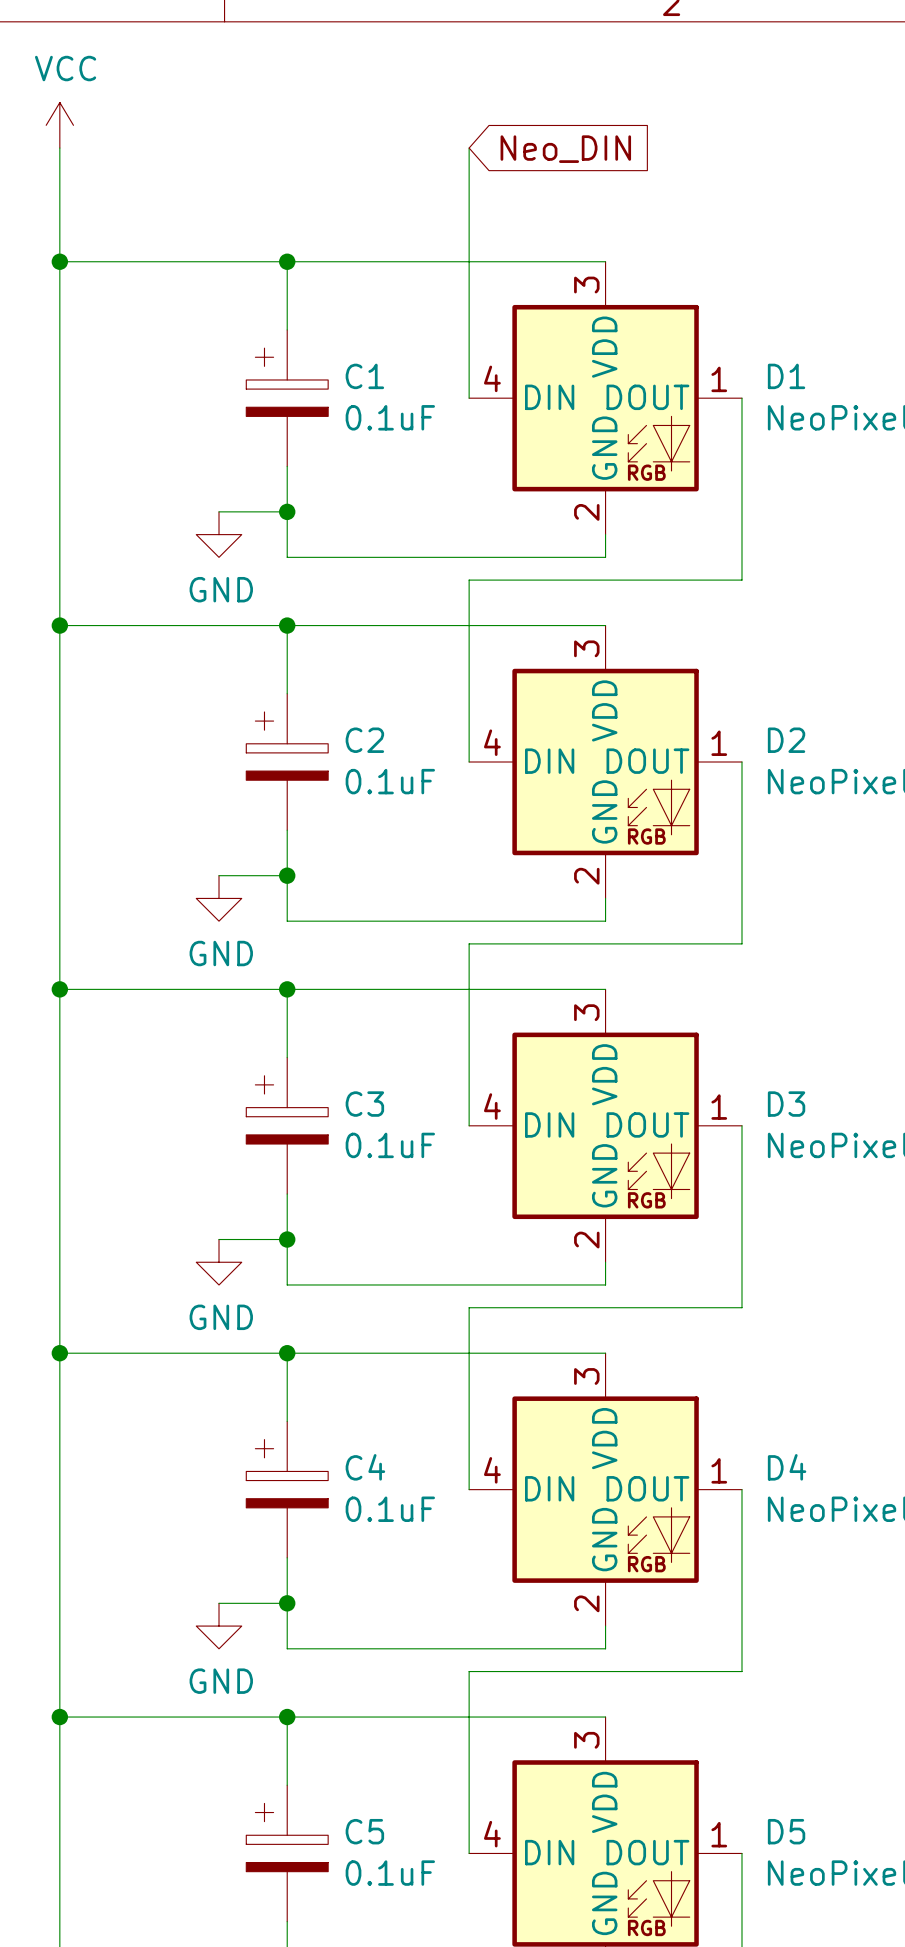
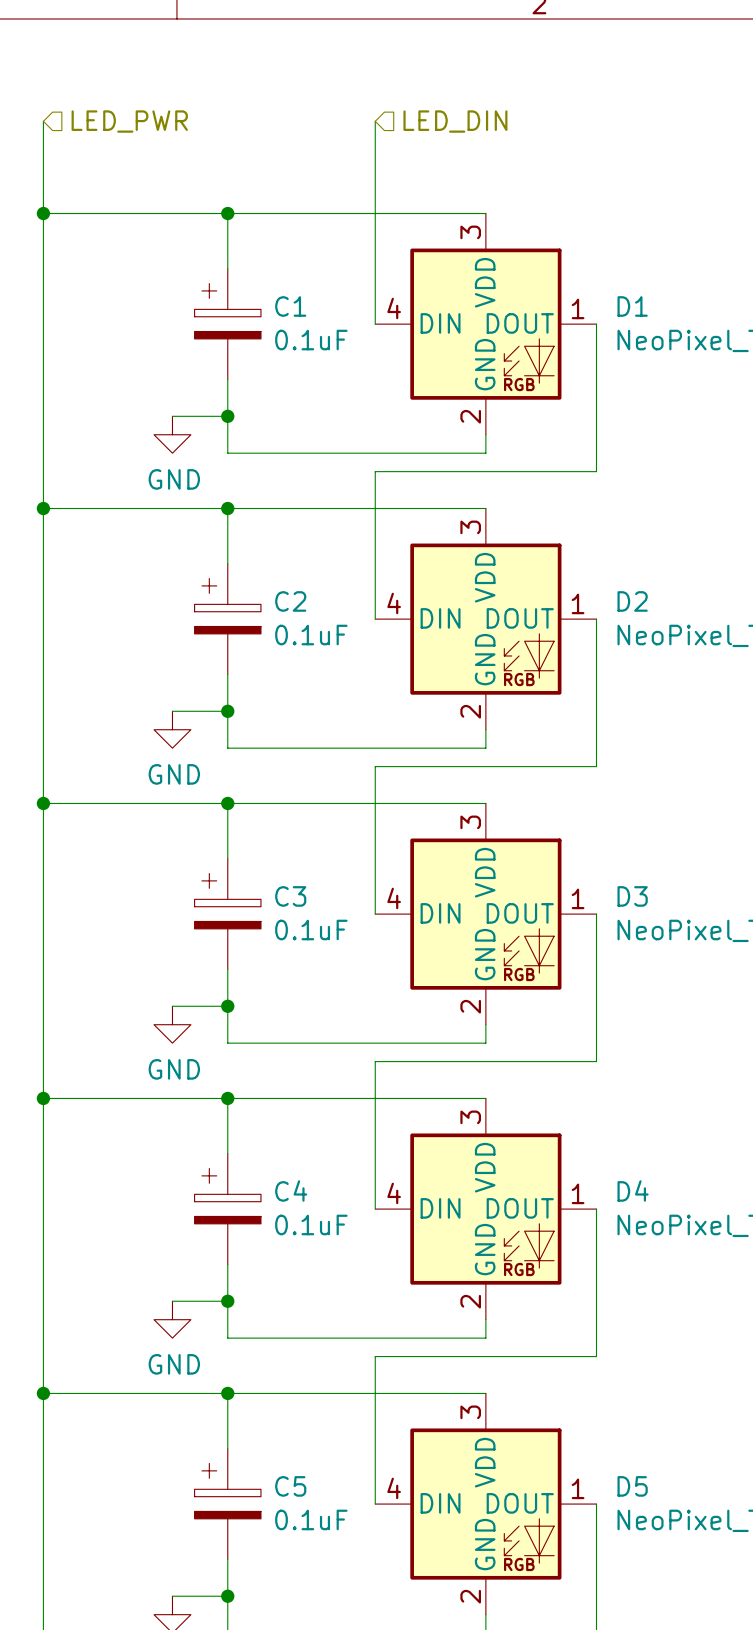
power symbol: VCC (59, 125) -> none
hierarchical label: none -> LED_PWR (129, 121)
hierarchical label: none -> LED_DIN (455, 121)
global label: Neo_DIN (565, 149) -> none

